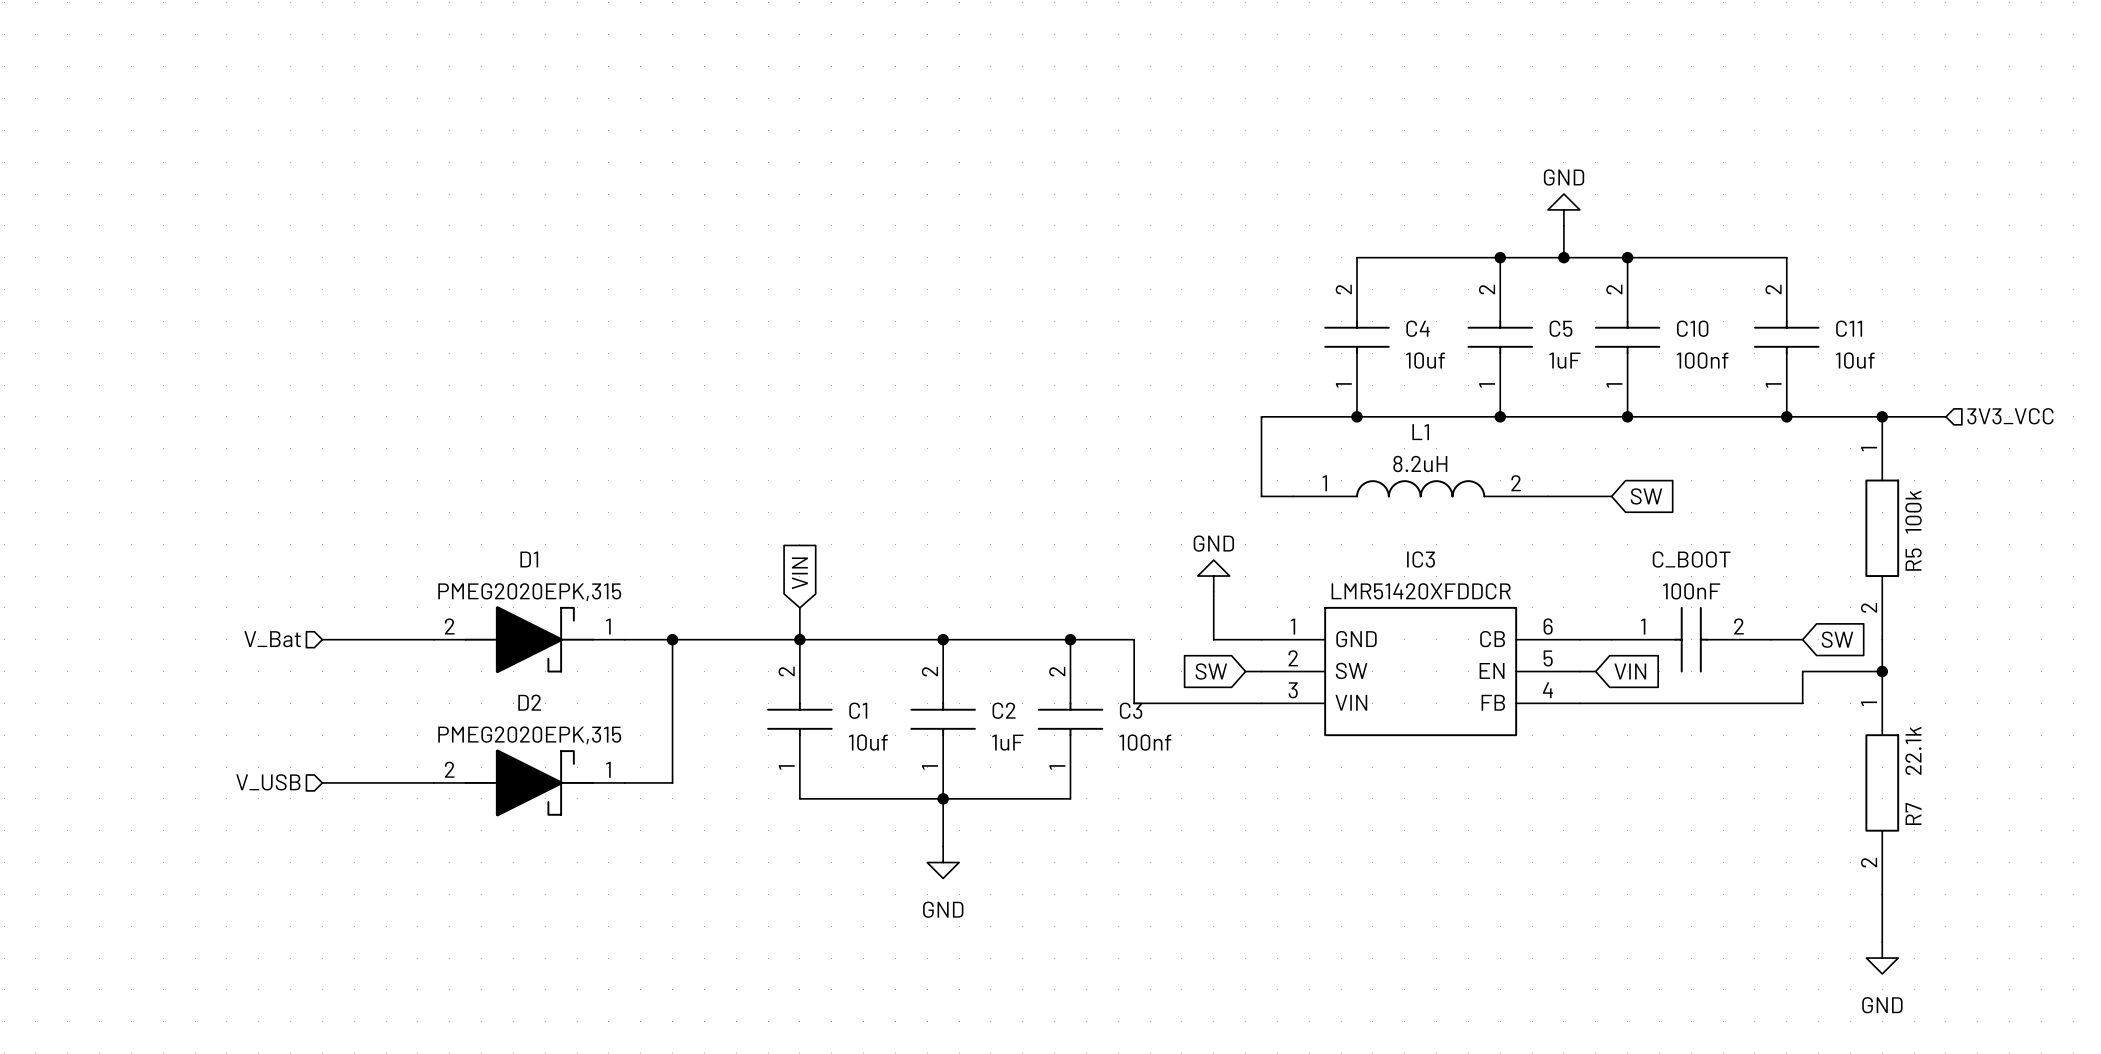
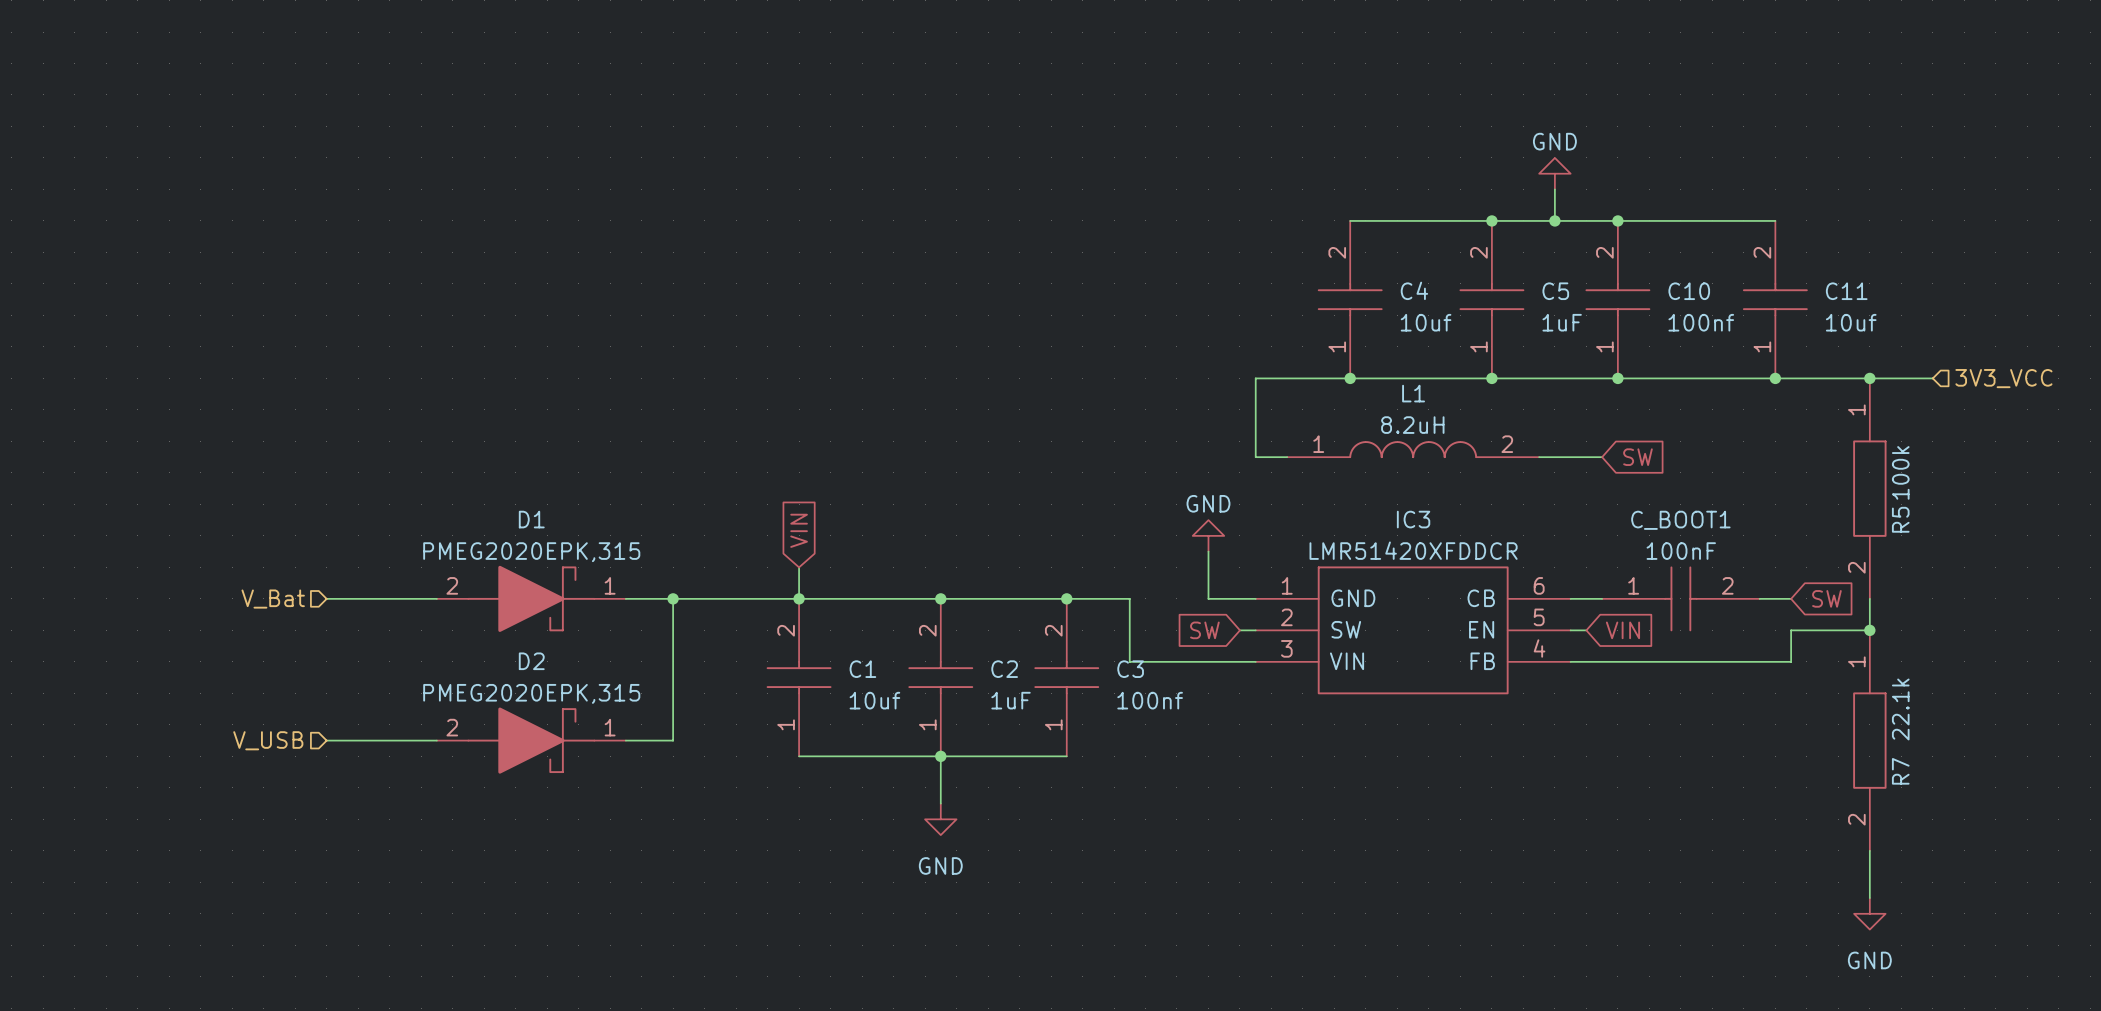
C_BOOT name: C_BOOT (1691, 559) -> C_BOOT1 (1680, 520)

